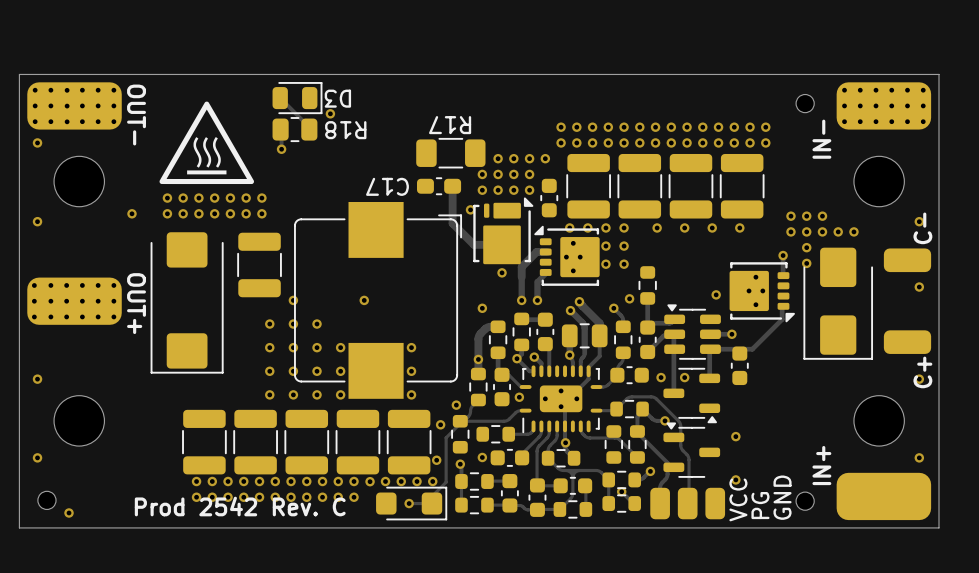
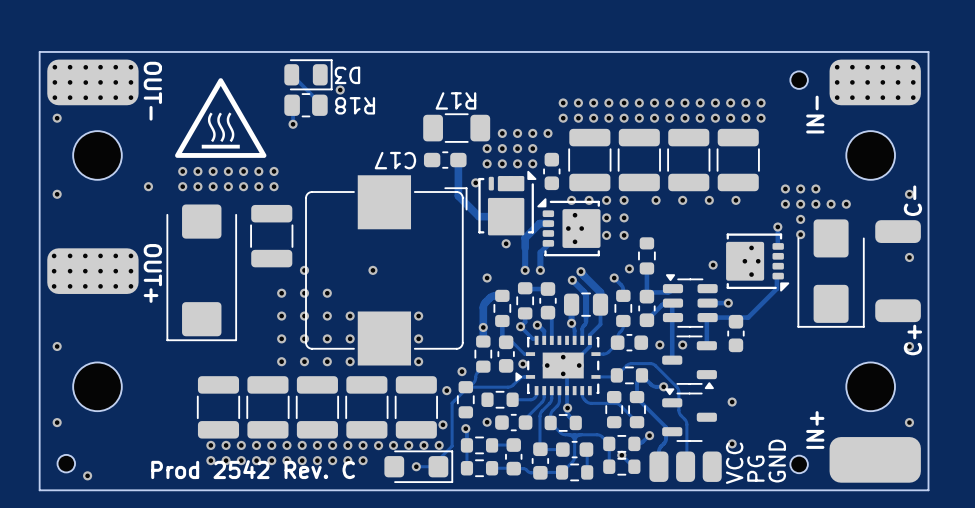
part footprint: [519, 365, 603, 434] -> [515, 335, 601, 396]

